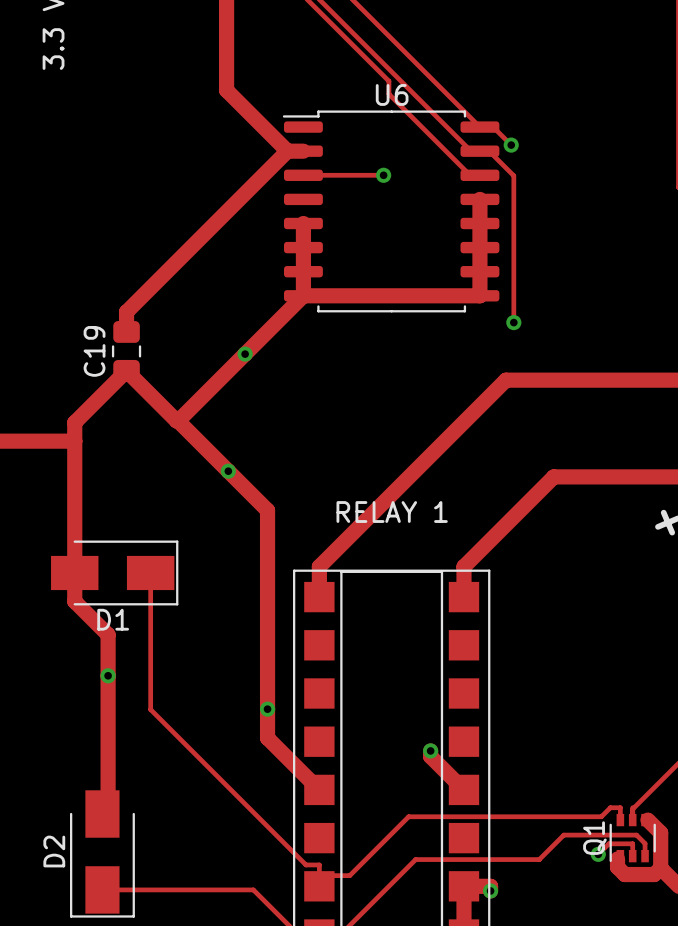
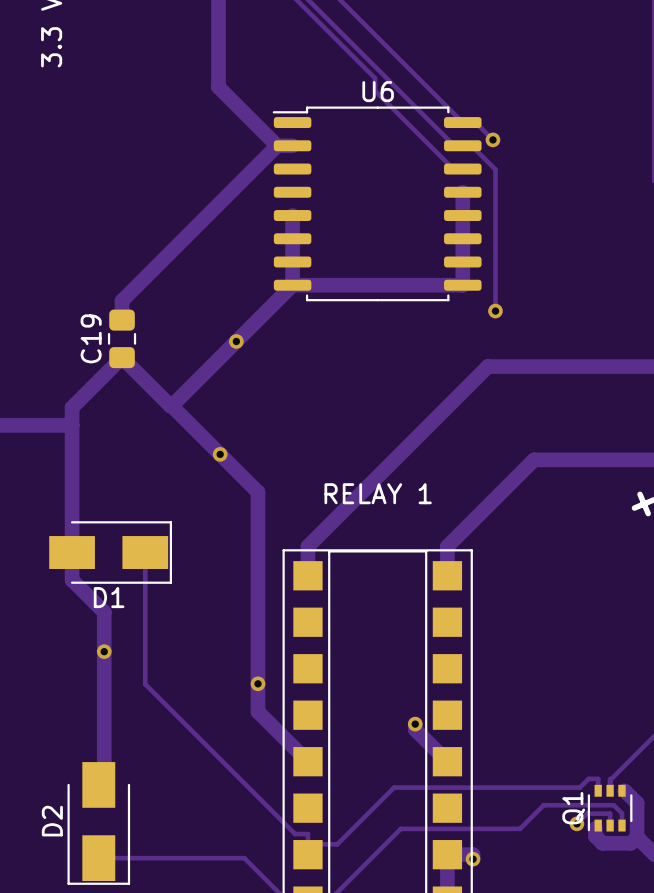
track: (303, 175) (383, 175) -> none
via: (383, 175) -> none

